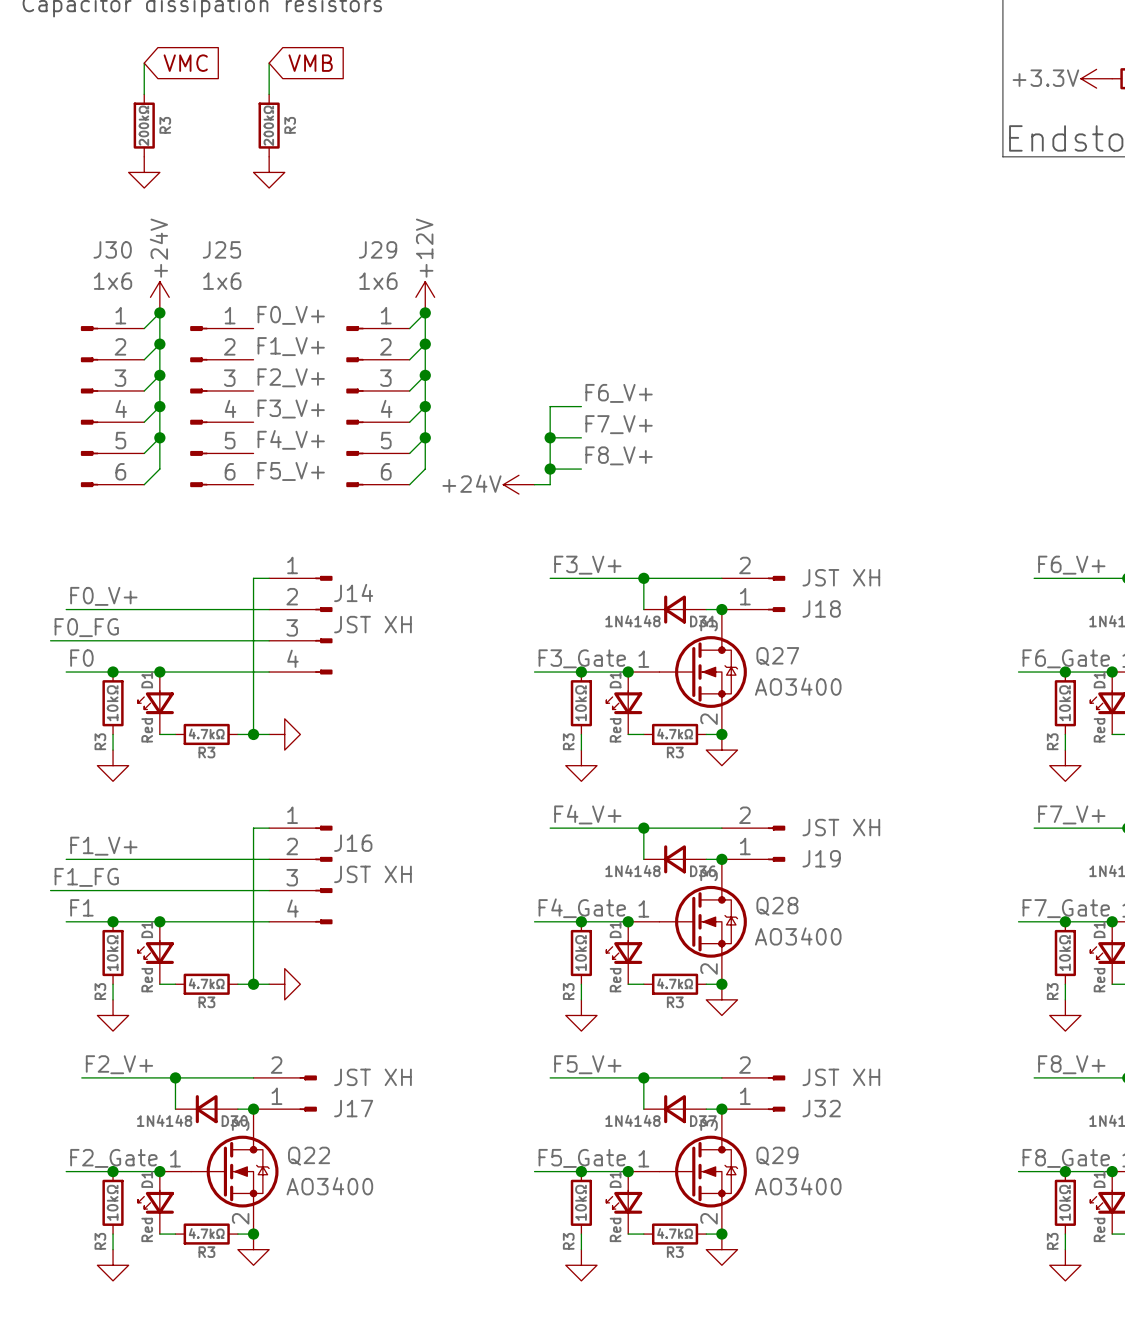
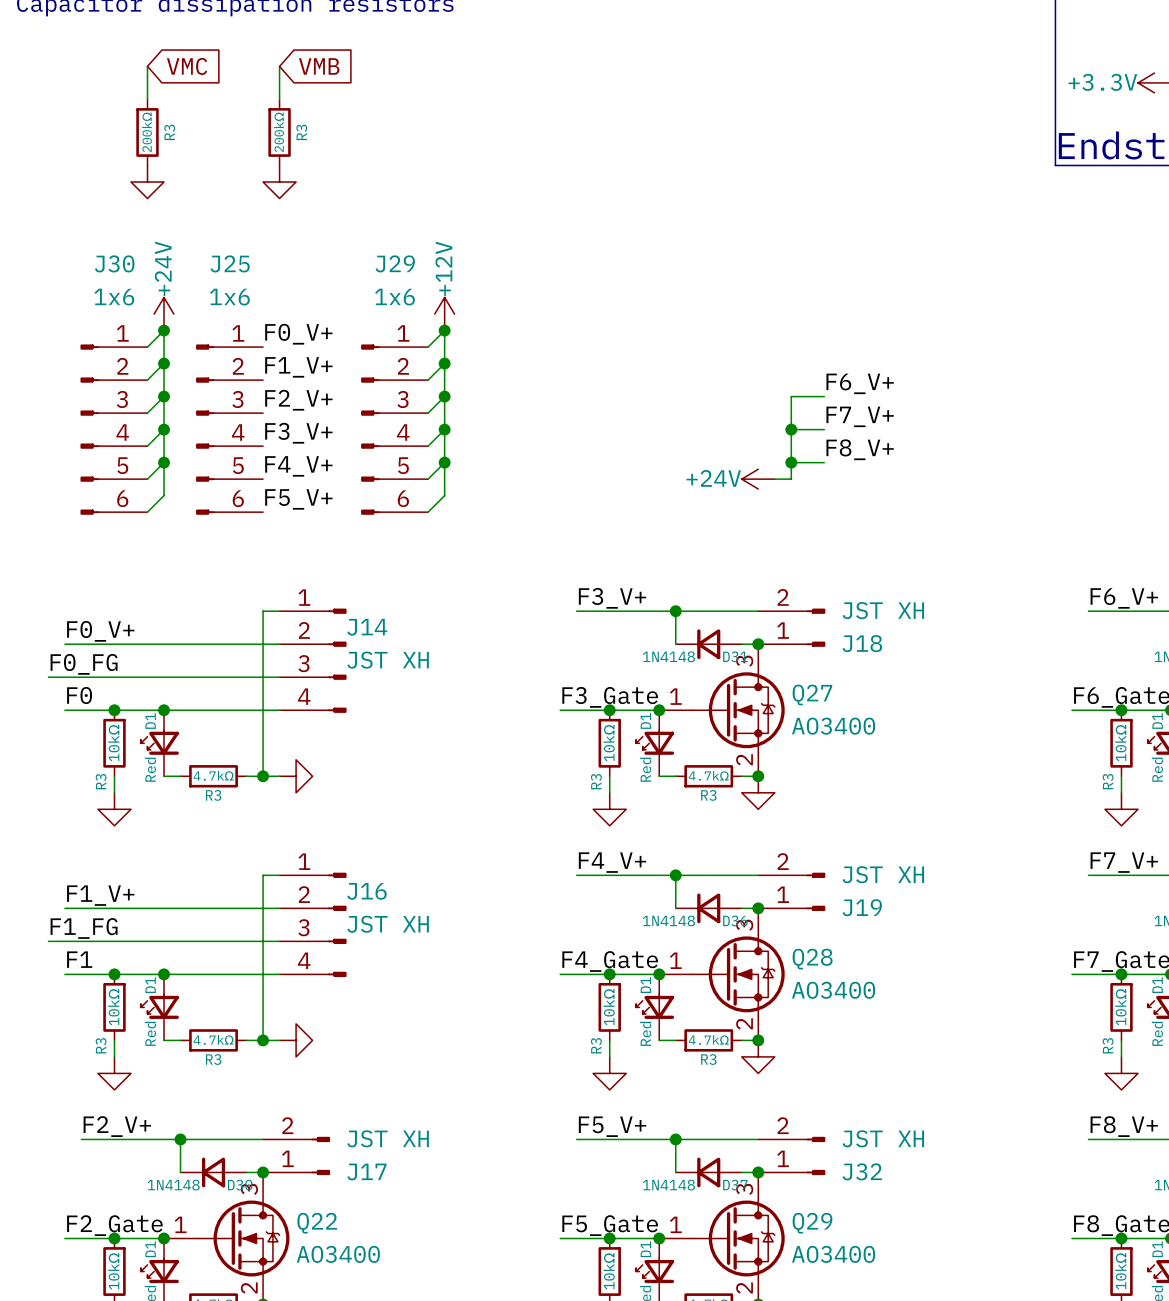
label position: F6_V+ (619, 393) -> F6_V+ (860, 383)
wire: (581, 406) (550, 406) (550, 484) (534, 484) -> (824, 396) (791, 396) (791, 479) (774, 479)
junction: none -> (791, 429)
label position: F7_V+ (619, 424) -> F7_V+ (860, 416)
wire: (550, 437) (581, 437) -> (791, 429) (824, 429)
junction: (550, 437) -> none
junction: none -> (791, 462)
label position: F8_V+ (619, 455) -> F8_V+ (860, 449)
wire: (550, 469) (581, 469) -> (791, 462) (824, 462)
junction: (550, 469) -> none
power symbol position: +24V (518, 484) -> +24V (758, 479)

